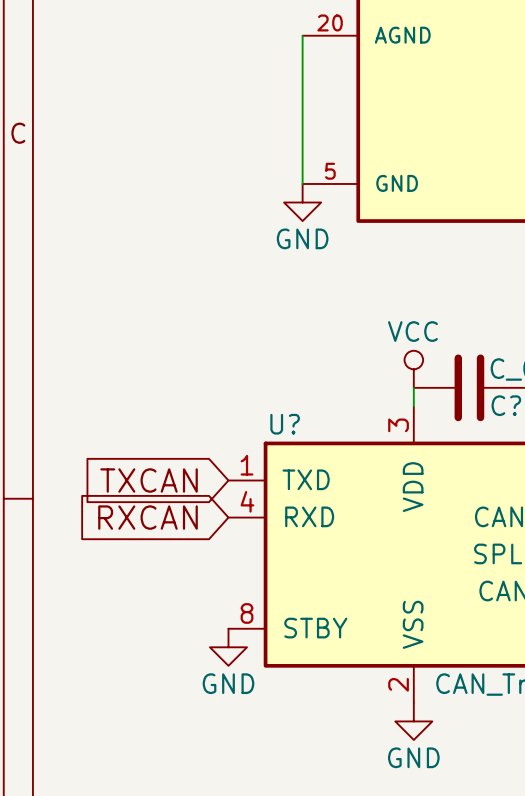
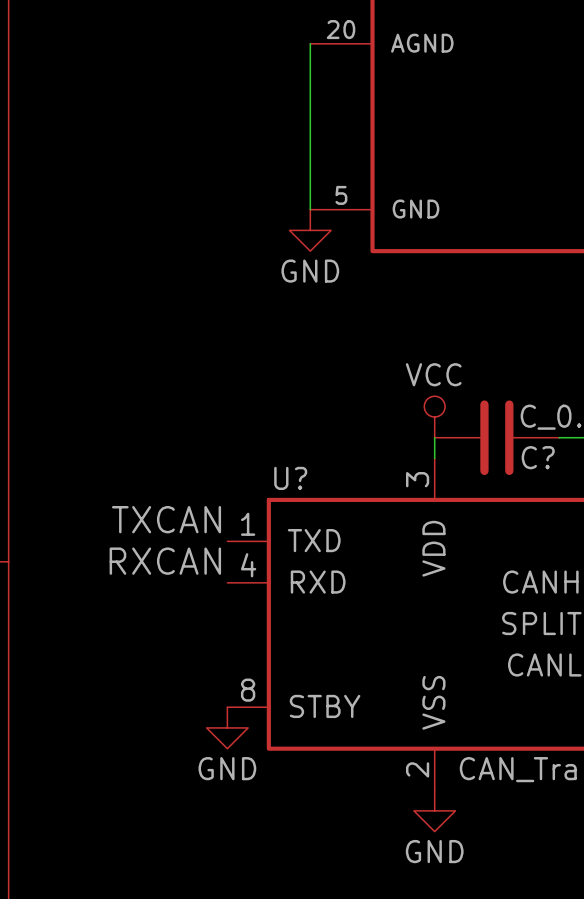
label: none -> TXCAN (166, 519)
global label: TXCAN (149, 480) -> none
label: none -> RXCAN (165, 561)
global label: RXCAN (148, 517) -> none

